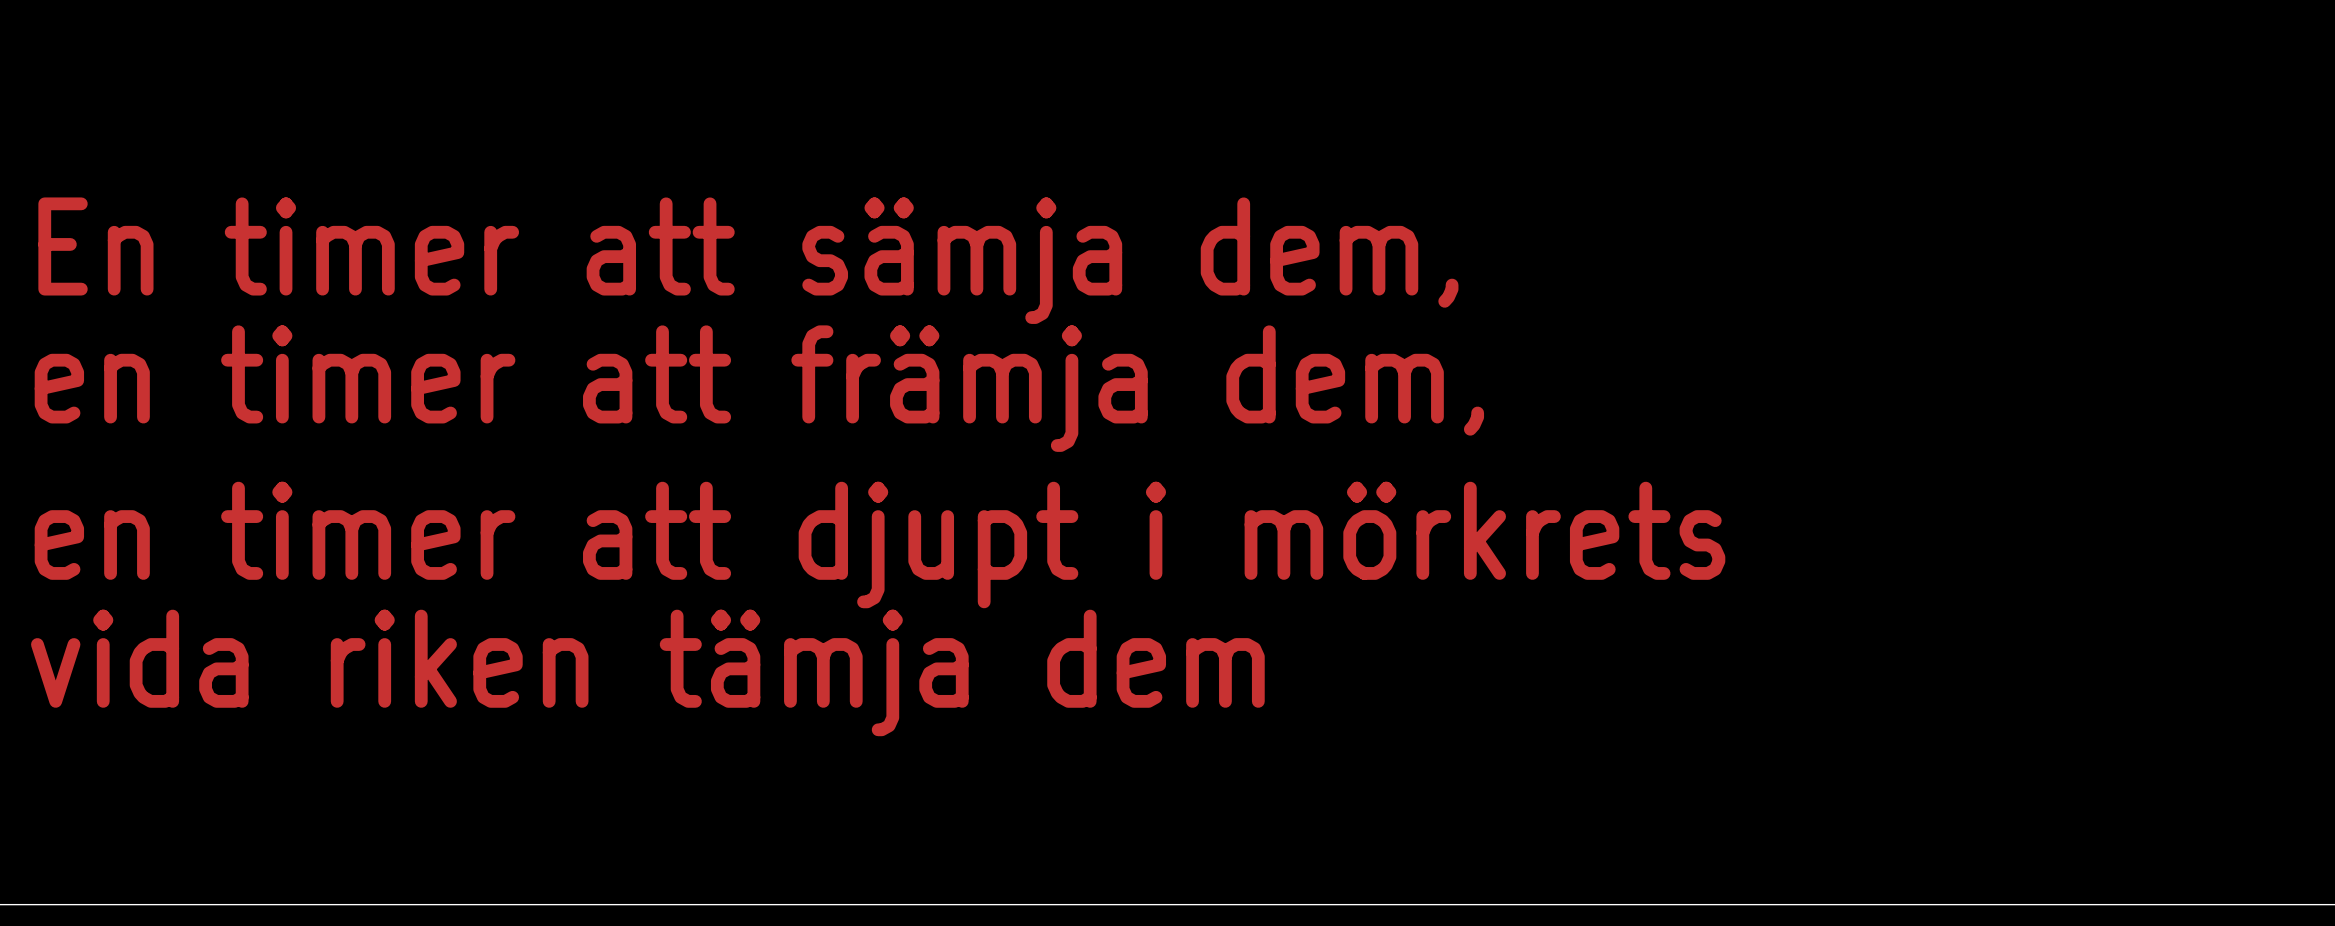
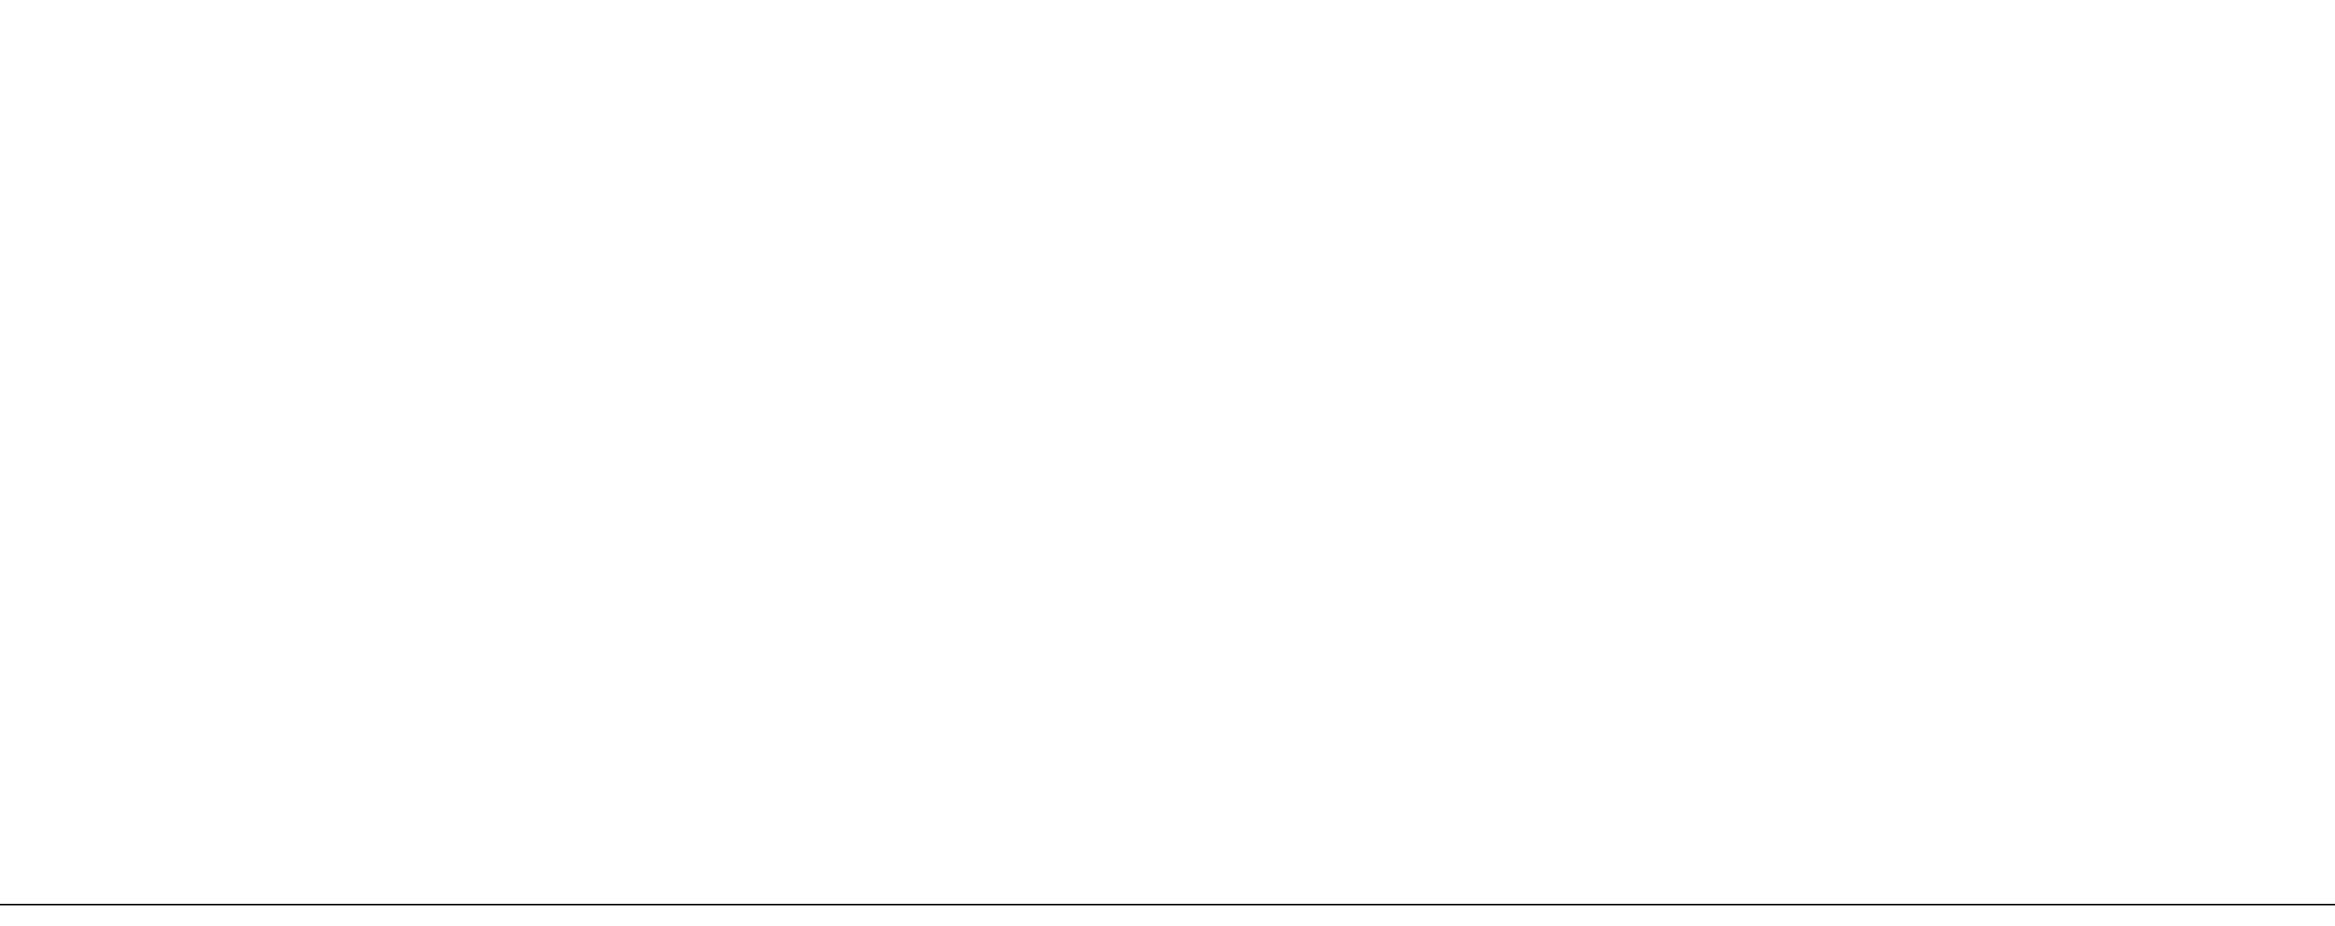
text: En timer att sämja dem, (748, 260) -> none
text: en timer att främja dem, (759, 388) -> none
text: en timer att djupt i mörkrets (880, 545) -> none
text: vida riken tämja dem (647, 672) -> none

